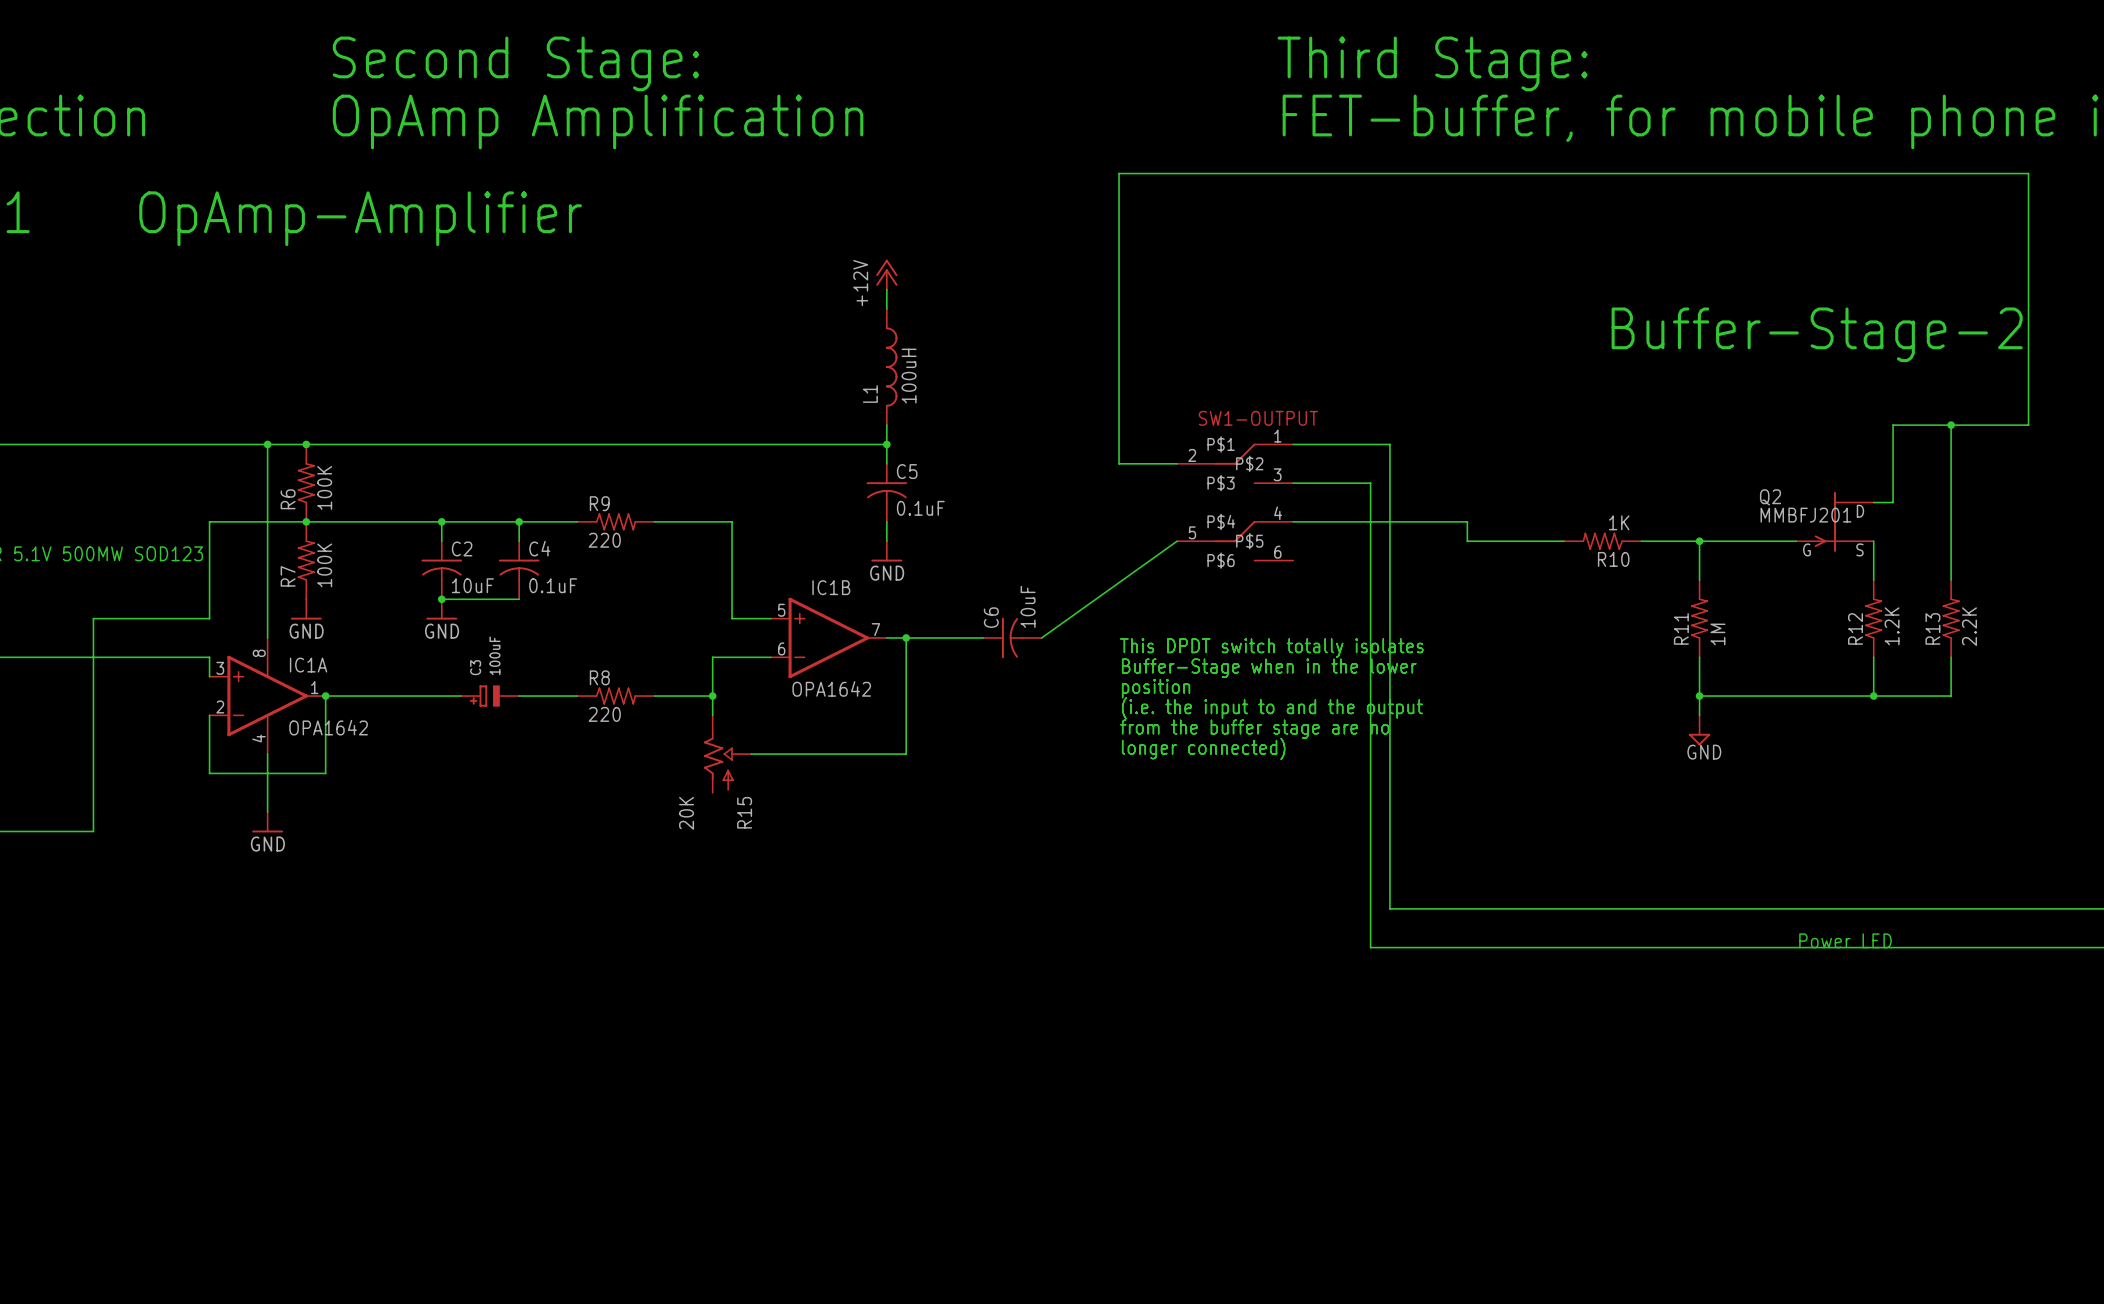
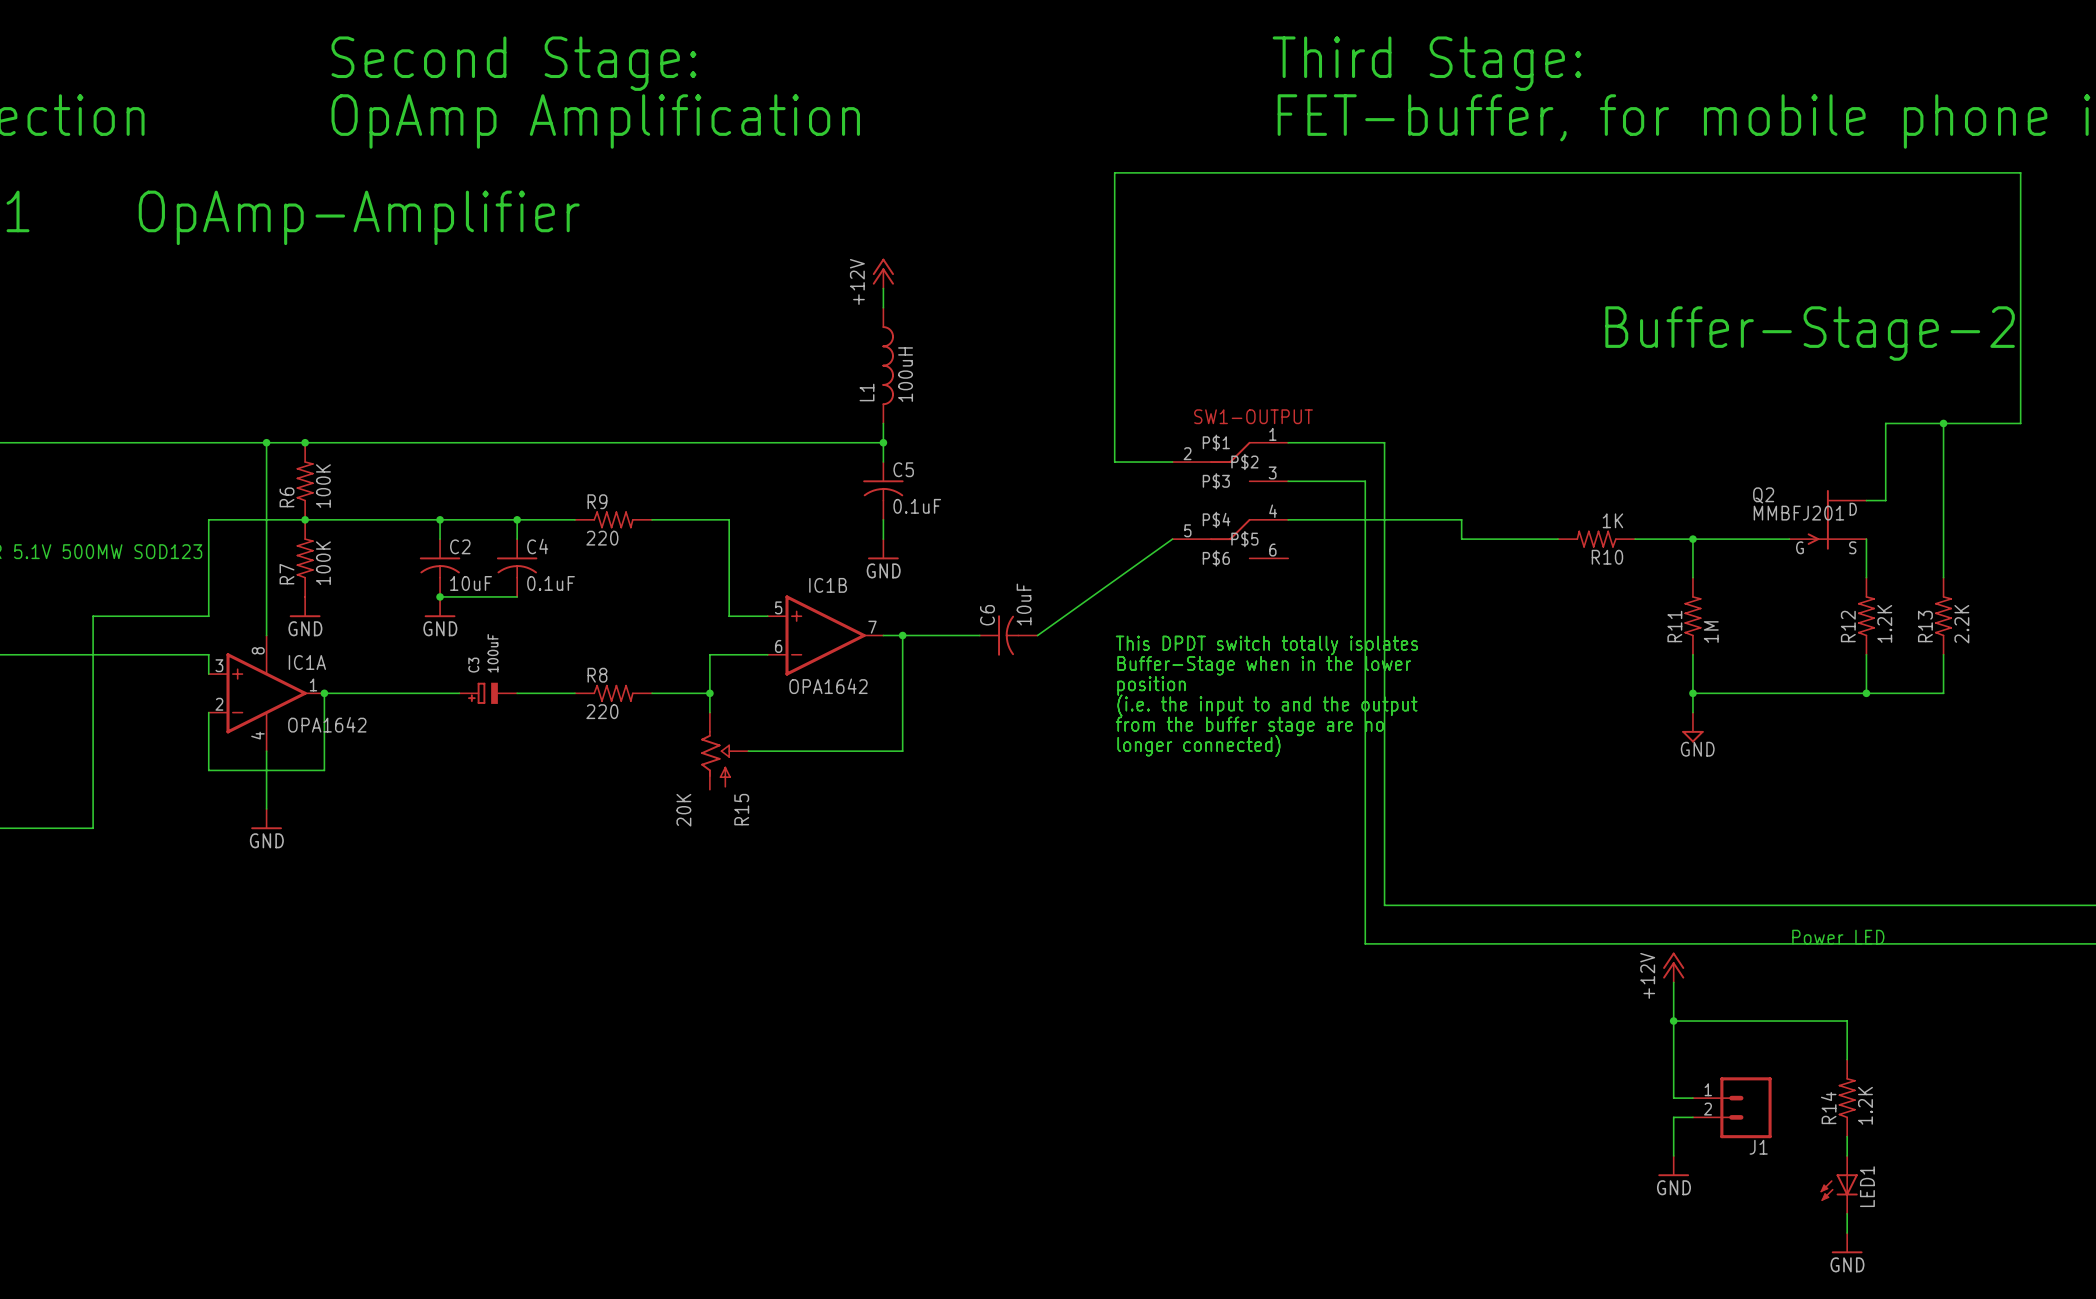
power symbol: none -> +12V (1673, 967)
wire: none -> (1673, 982) (1673, 1098) (1692, 1098)
wire: none -> (1673, 1021) (1847, 1021) (1847, 1059)
junction: none -> (1673, 1021)
R14: none -> 1.2K (1847, 1098)
J1: none -> (1732, 1107)
wire: none -> (1692, 1117) (1673, 1117) (1673, 1155)
wire: none -> (1847, 1136) (1847, 1155)
power symbol: none -> GND (1673, 1166)
LED1: none -> (1839, 1184)
wire: none -> (1847, 1213) (1847, 1233)
power symbol: none -> GND (1847, 1243)

